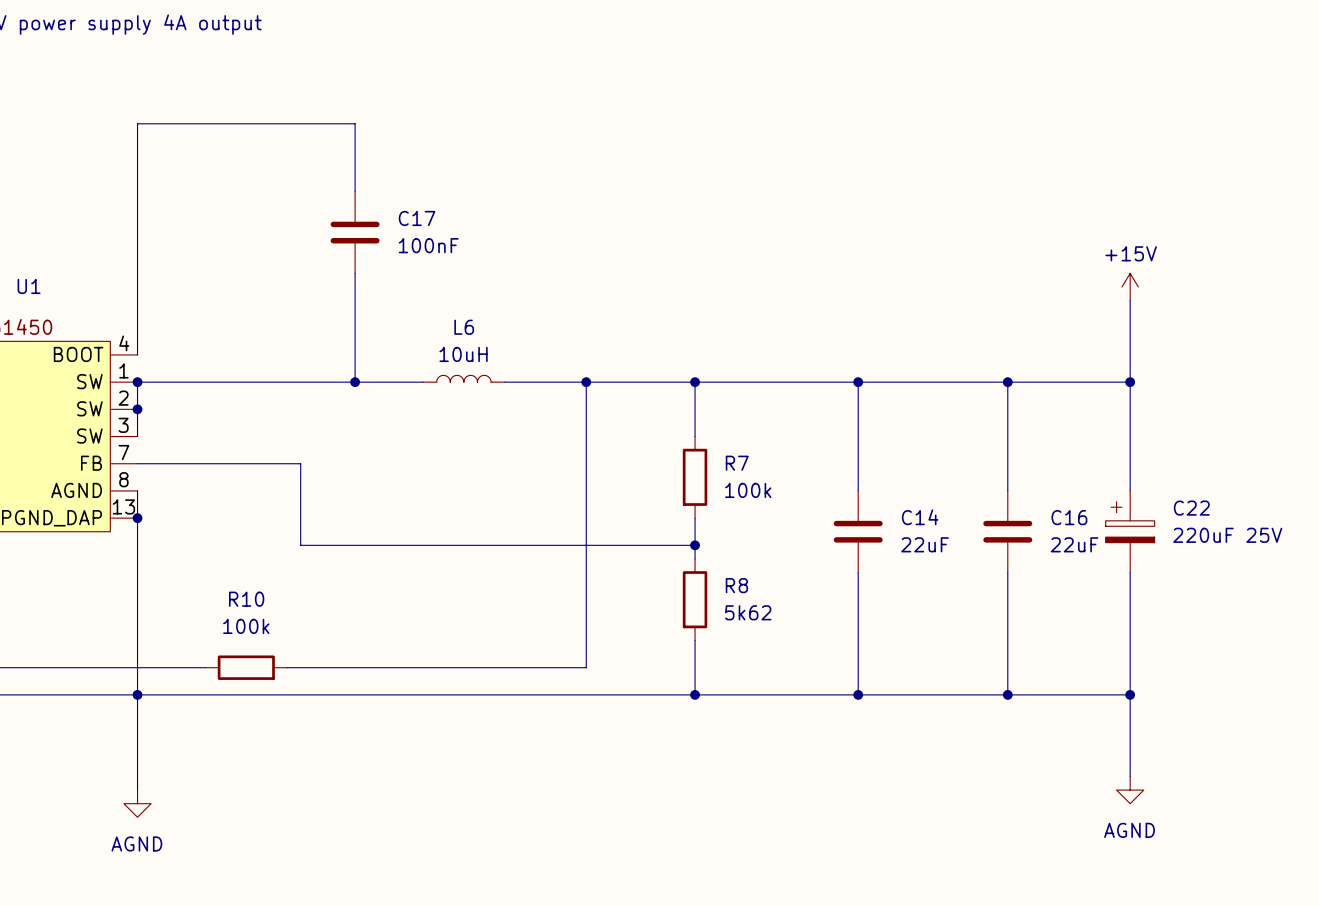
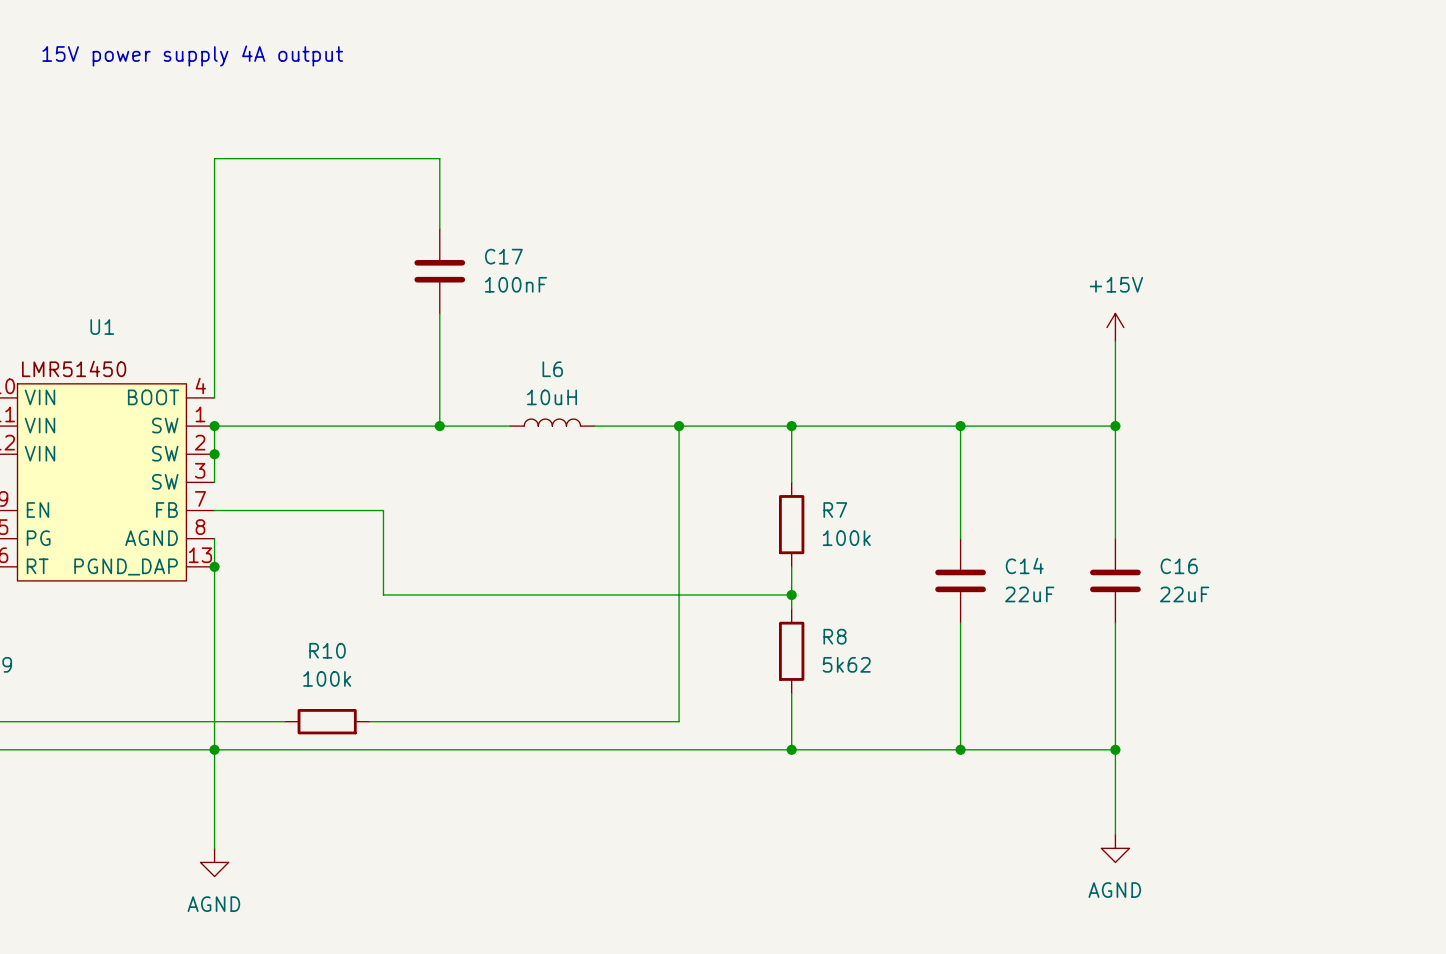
power symbol text position: +15V (1131, 253) -> +15V (1116, 284)
power symbol position: +15V (1130, 286) -> +15V (1115, 327)
wire: (1130, 300) (1130, 490) -> none
wire: (1007, 382) (1130, 382) -> (1115, 426) (1115, 341)
junction: (1130, 382) -> none
C22: 220uF 25V (1130, 531) -> none
wire: (1130, 572) (1130, 776) -> none
wire: (1007, 694) (1130, 694) -> (1115, 749) (1115, 834)
junction: (1130, 694) -> none
power symbol position: AGND (1130, 790) -> AGND (1115, 848)

